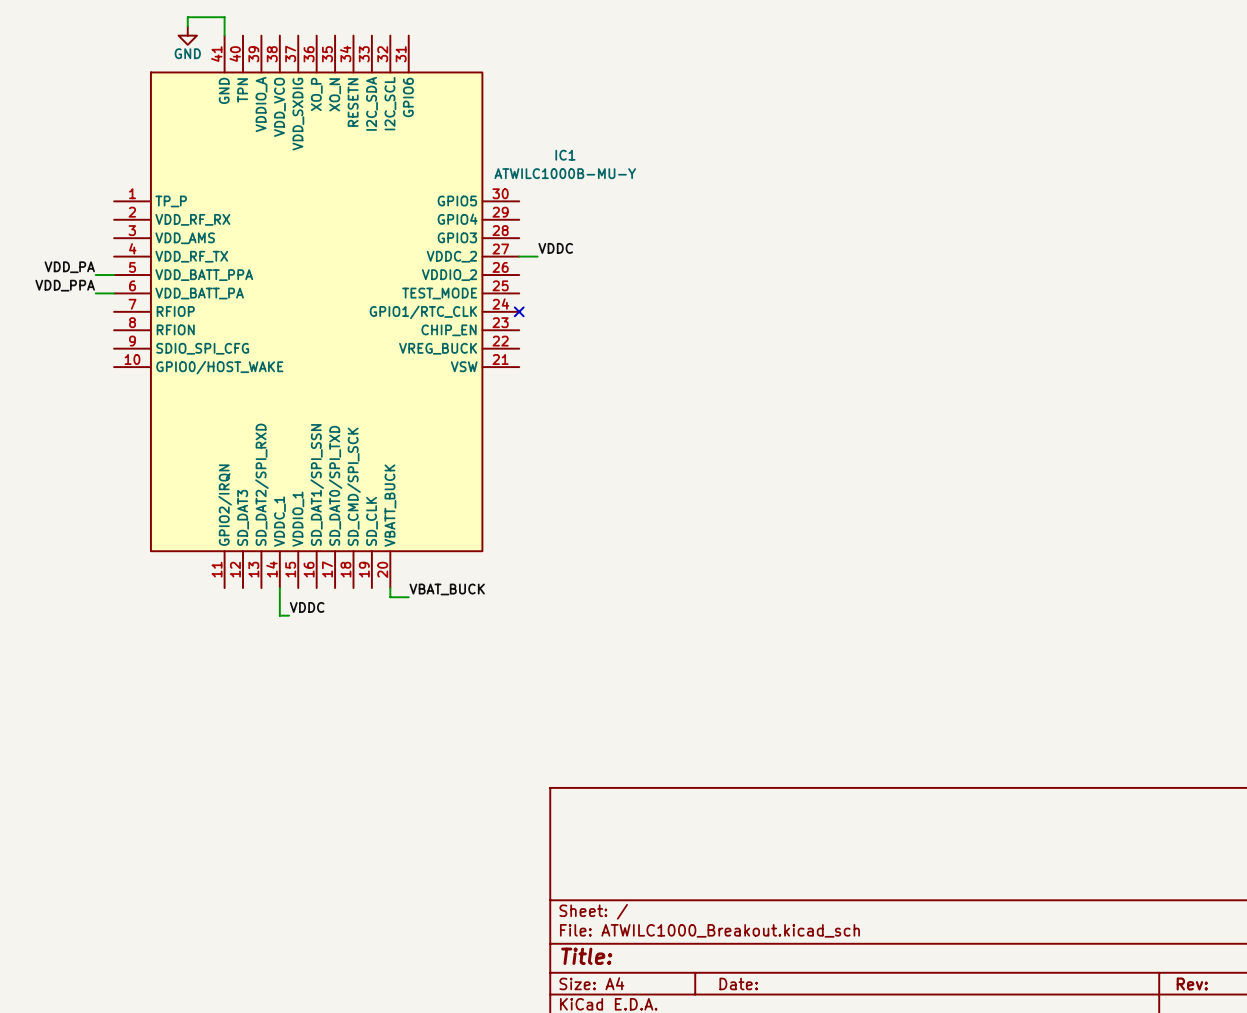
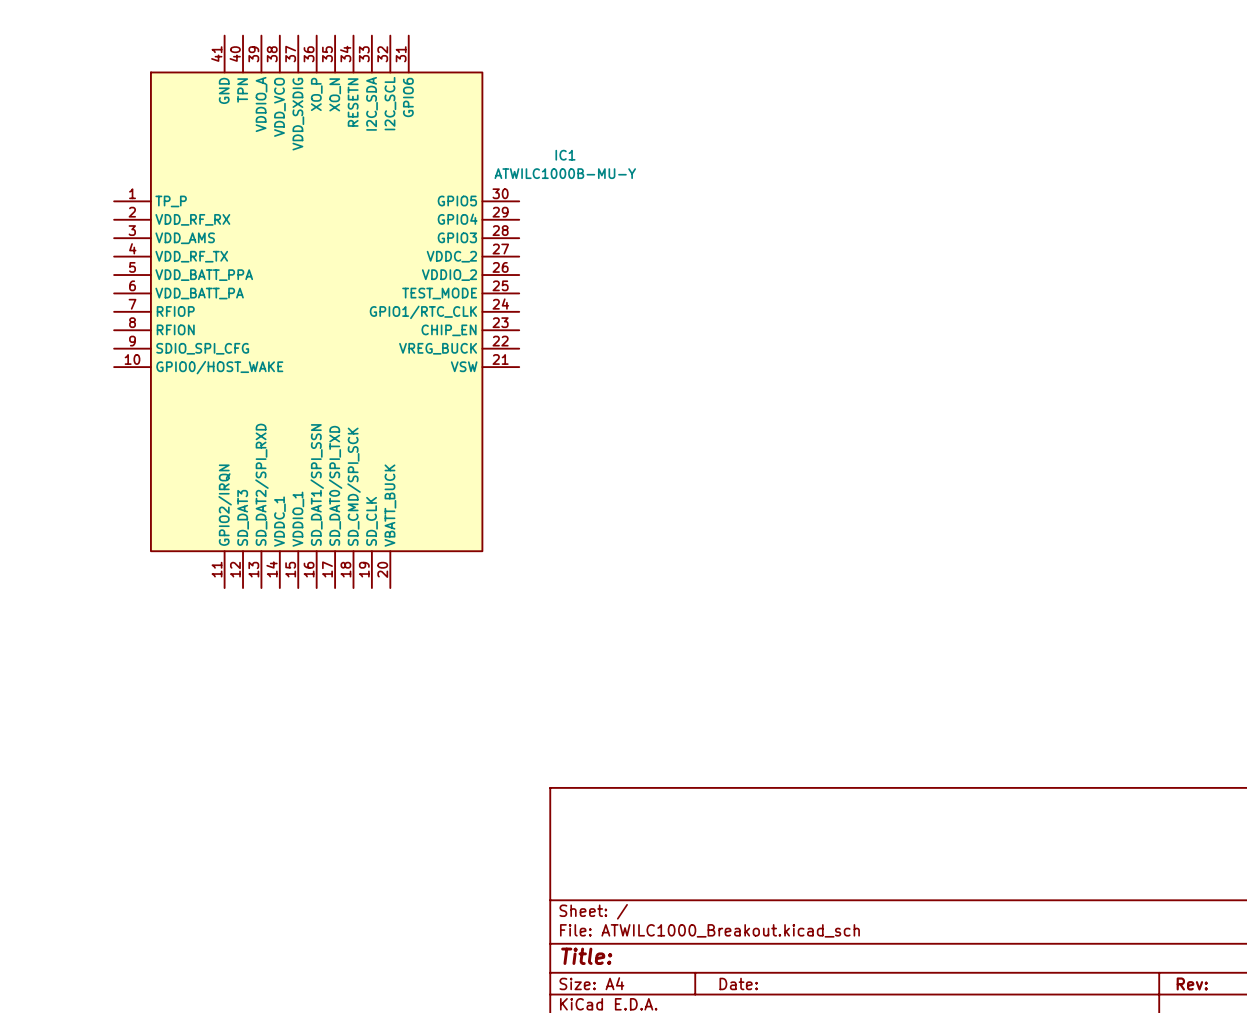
wire: (187, 26) (187, 17) (224, 17) (224, 35) -> none
power symbol: GND (187, 35) -> none
label: VDDC (555, 248) -> none
wire: (519, 256) (537, 256) -> none
label: VDD_PA (69, 267) -> none
wire: (95, 275) (114, 275) -> none
label: VDD_PPA (65, 285) -> none
wire: (95, 293) (114, 293) -> none
no-connect mark: (519, 311) -> none
wire: (279, 588) (279, 615) (289, 615) -> none
wire: (390, 588) (390, 597) (408, 597) -> none
label: VBAT_BUCK (447, 589) -> none
label: VDDC (307, 607) -> none

